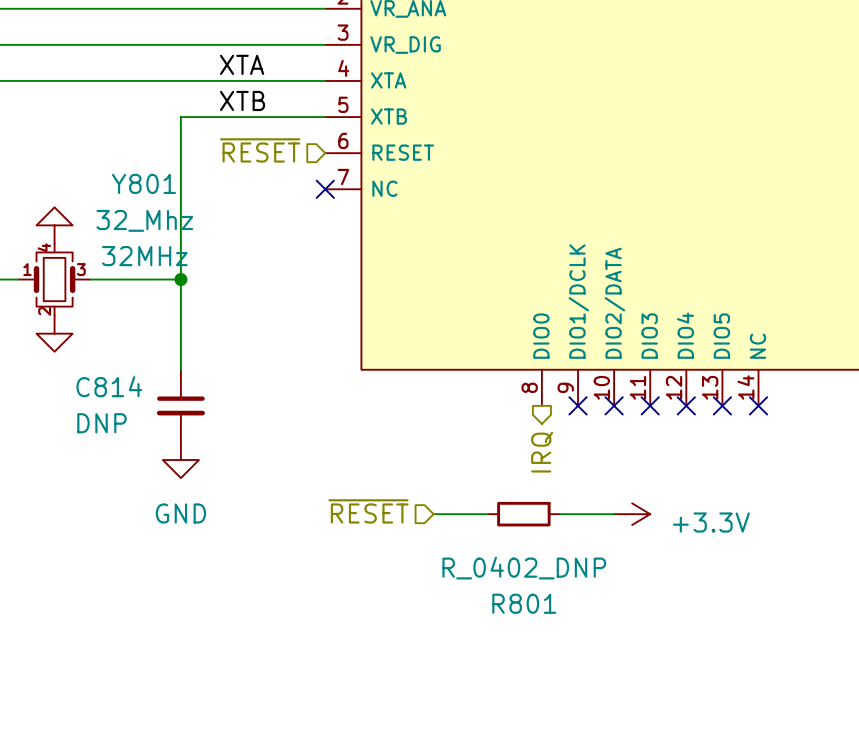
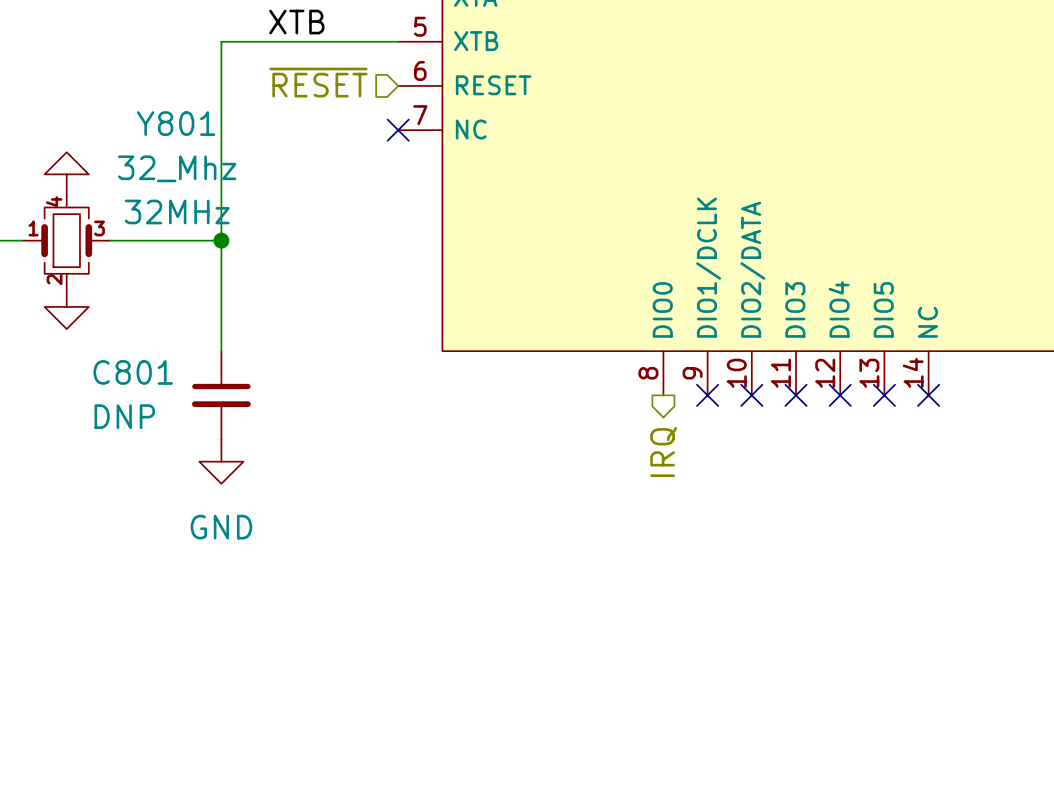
C814 name: C814 (109, 386) -> C801 (133, 372)
hierarchical label: ~{RESET} (368, 511) -> none
wire: (433, 514) (487, 514) -> none
R801: R_0402_DNP (523, 514) -> none
wire: (559, 514) (614, 514) -> none
power symbol: +3.3V (632, 514) -> none

